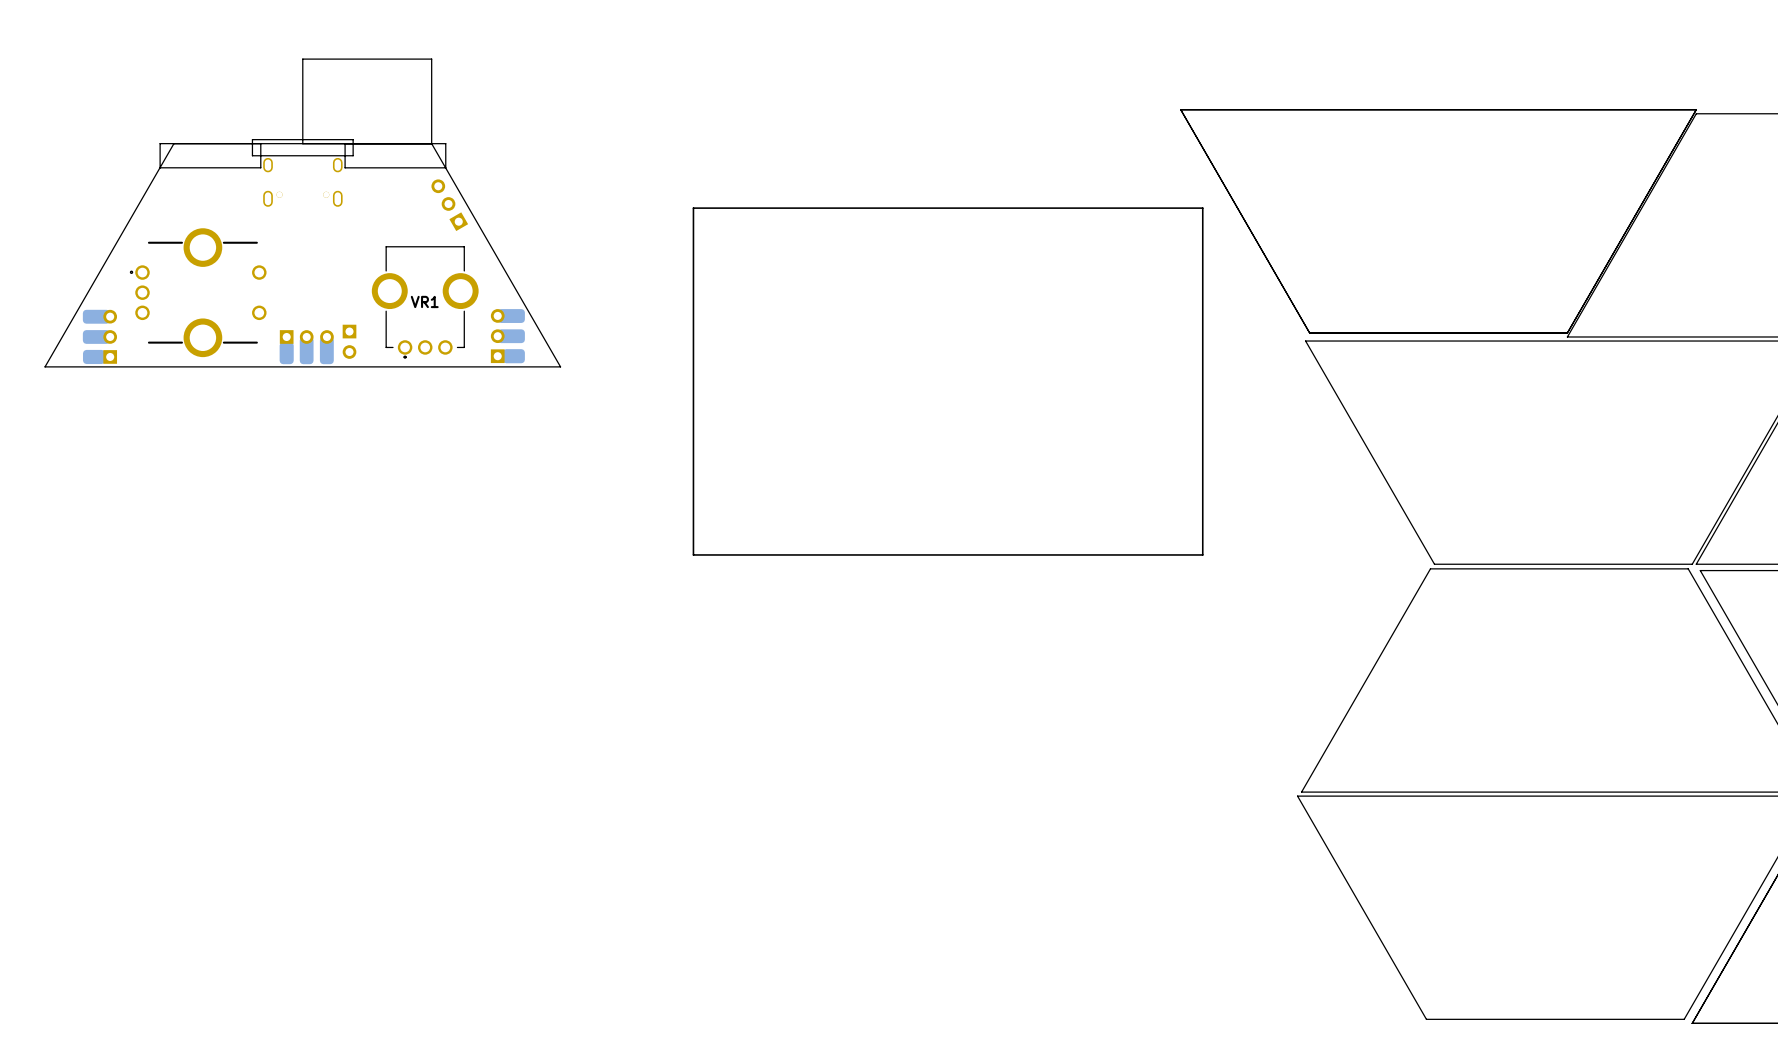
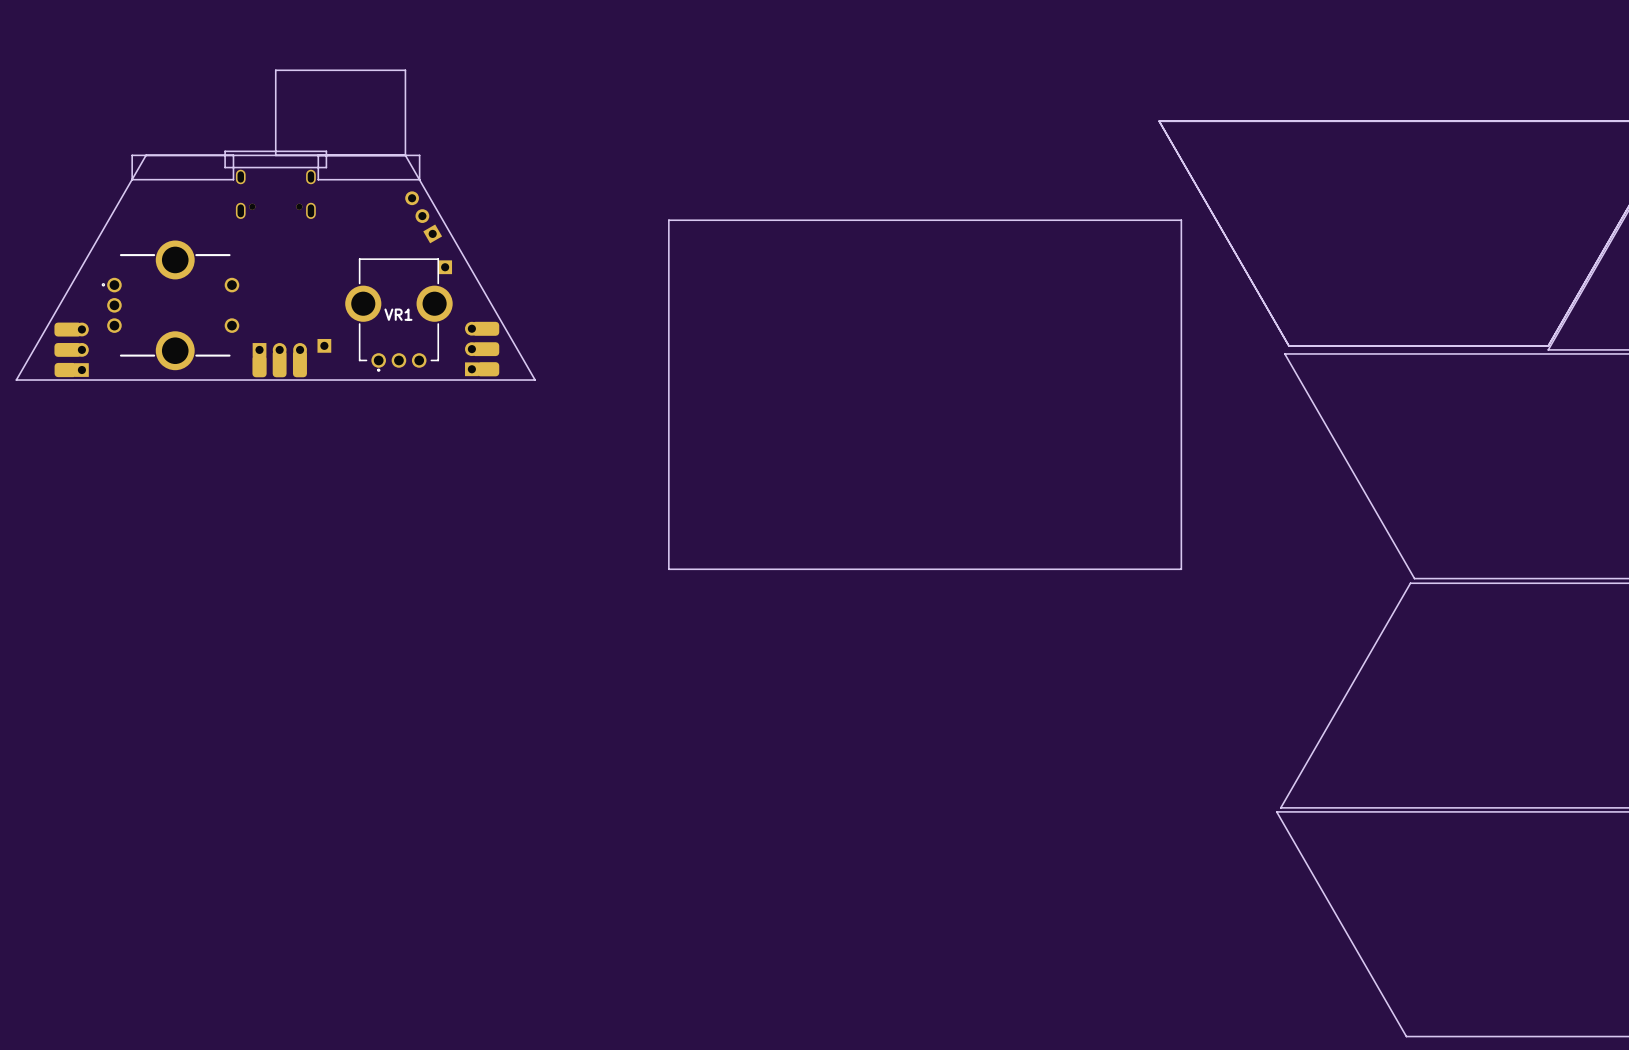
part: none -> (445, 267)
part: none -> (324, 345)
part: (349, 341) -> none

